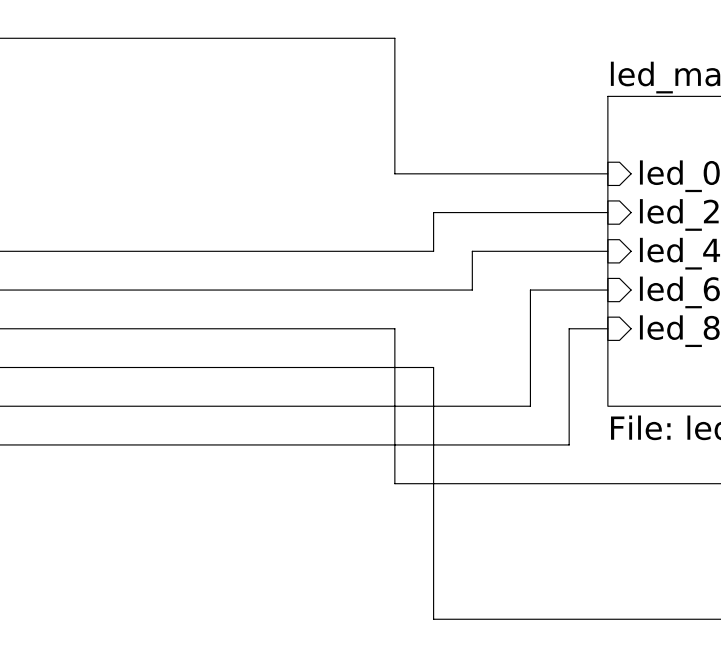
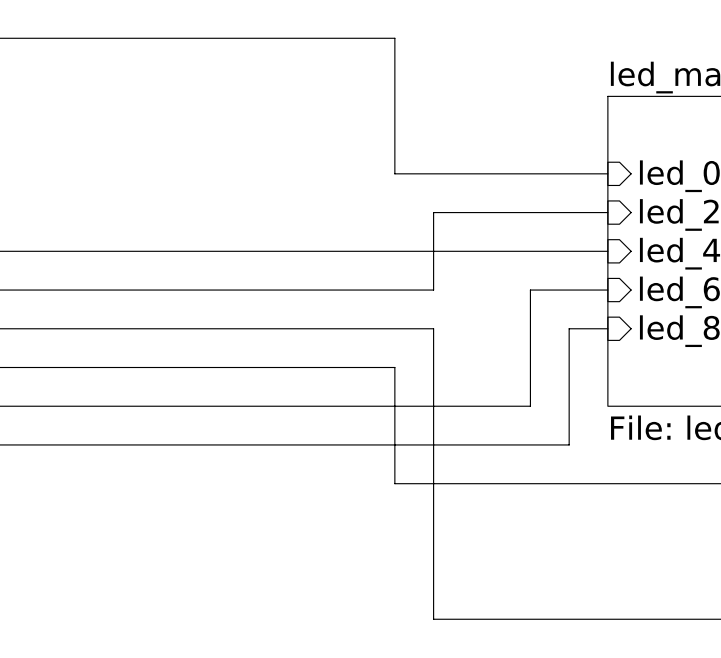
wire: (472, 251) (472, 290) (433, 290) -> (472, 251) (433, 251) (433, 290)
wire: (394, 328) (394, 367) (433, 367) -> (394, 328) (433, 328) (433, 367)

